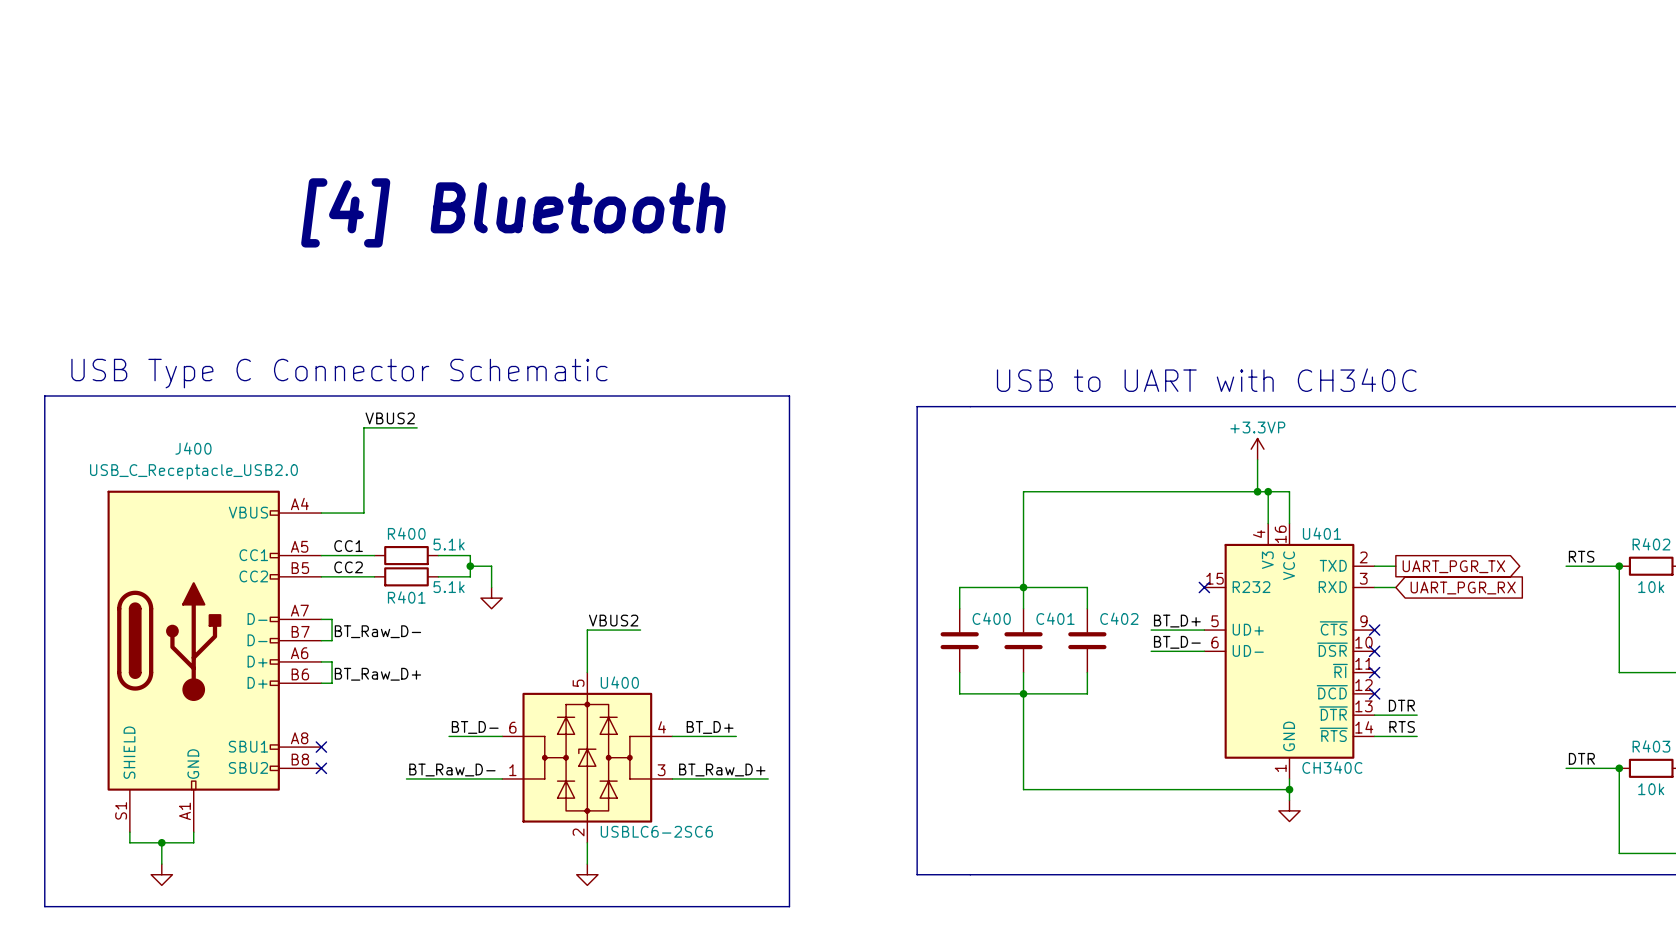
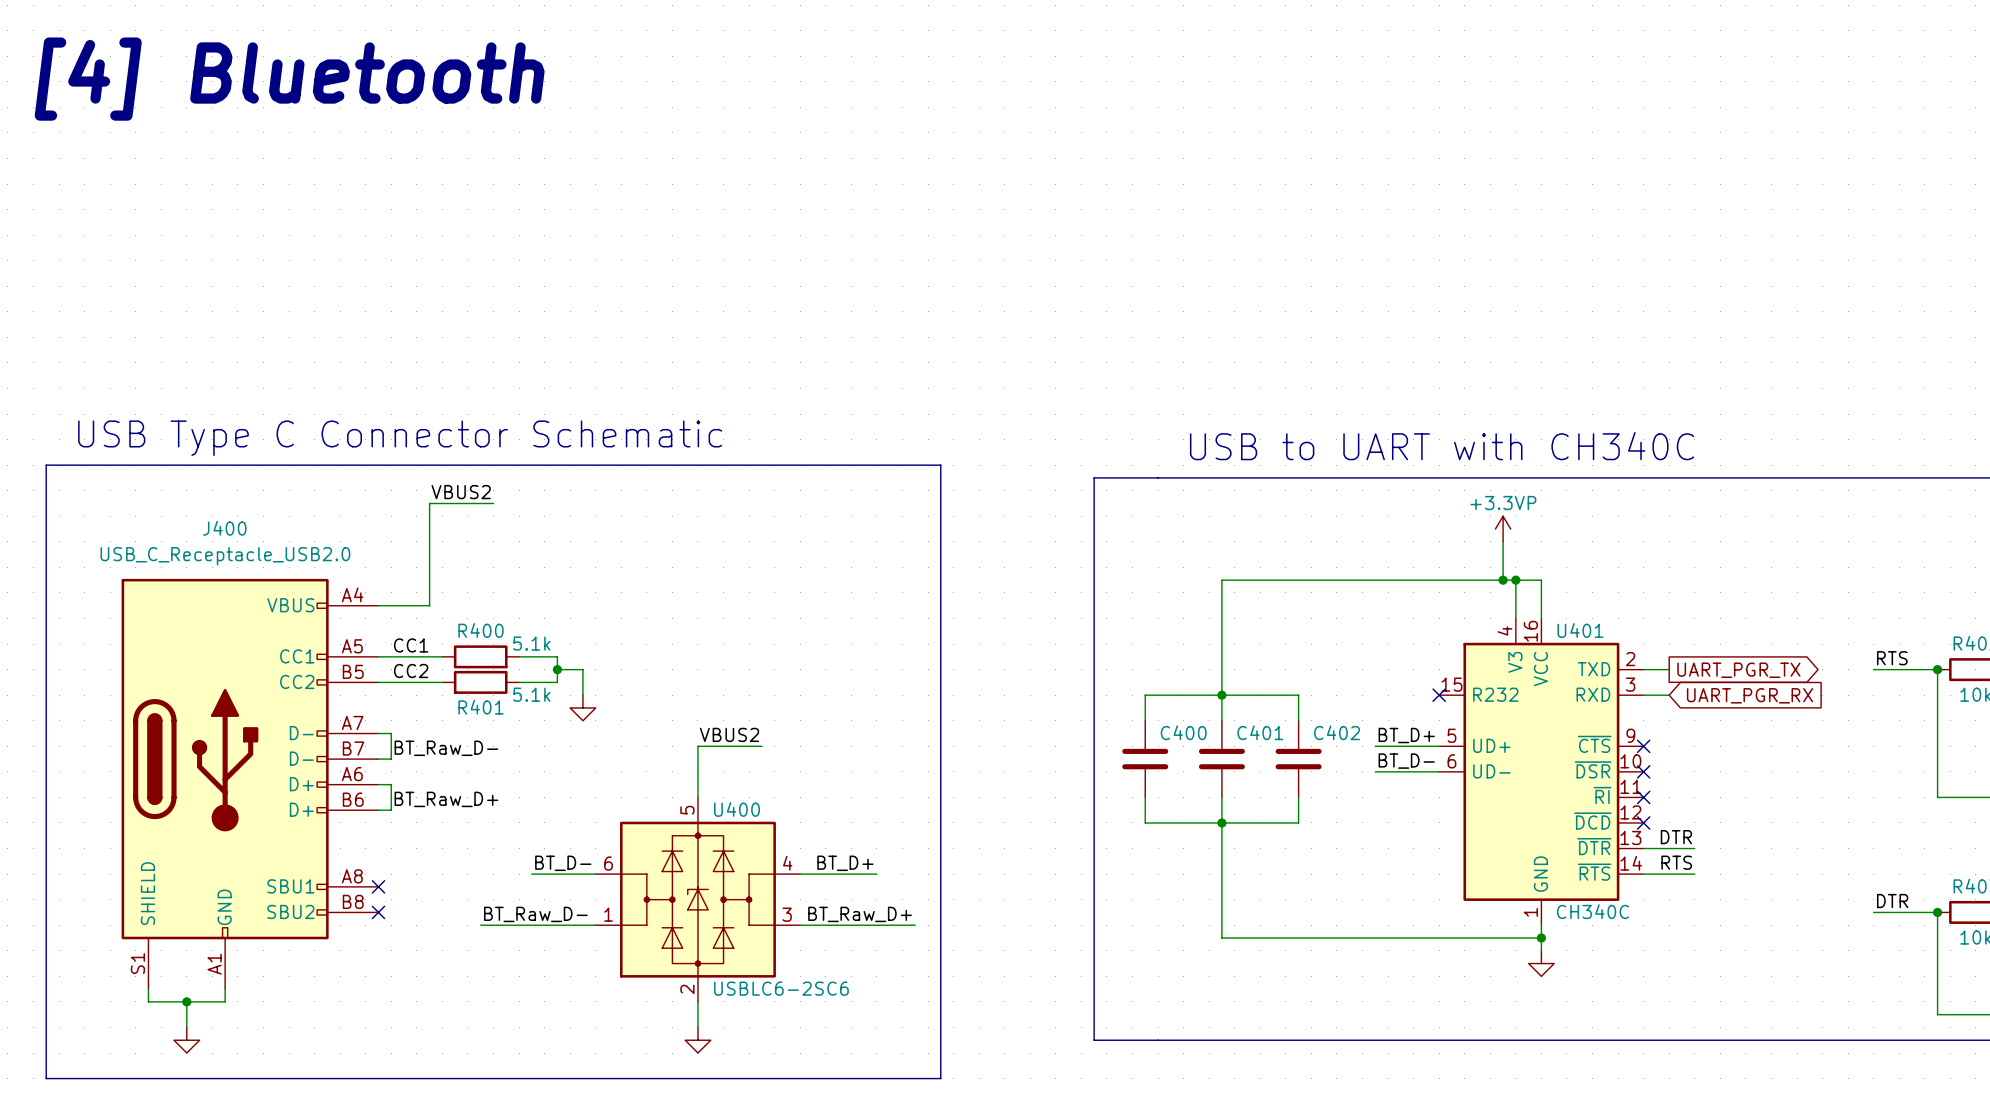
text: none -> [4] Bluetooth (289, 79)
text: [4] Bluetooth (513, 212) -> none

